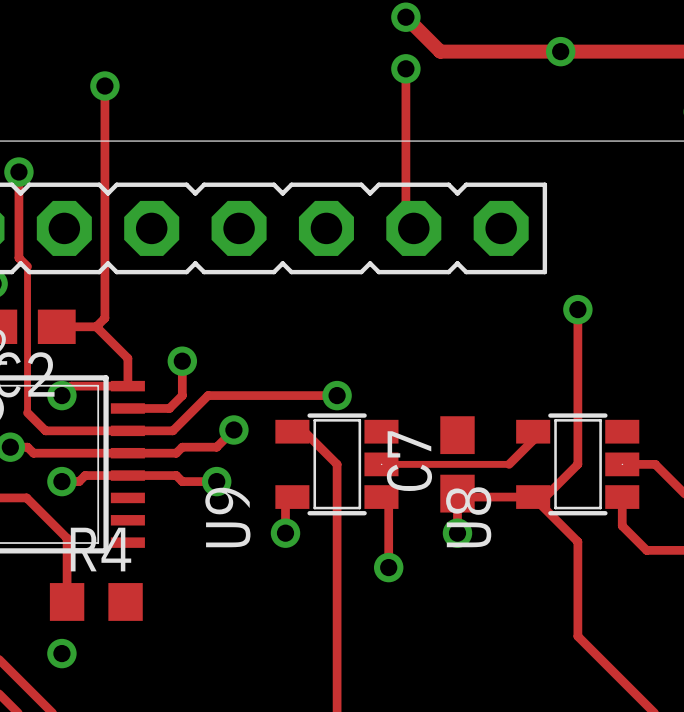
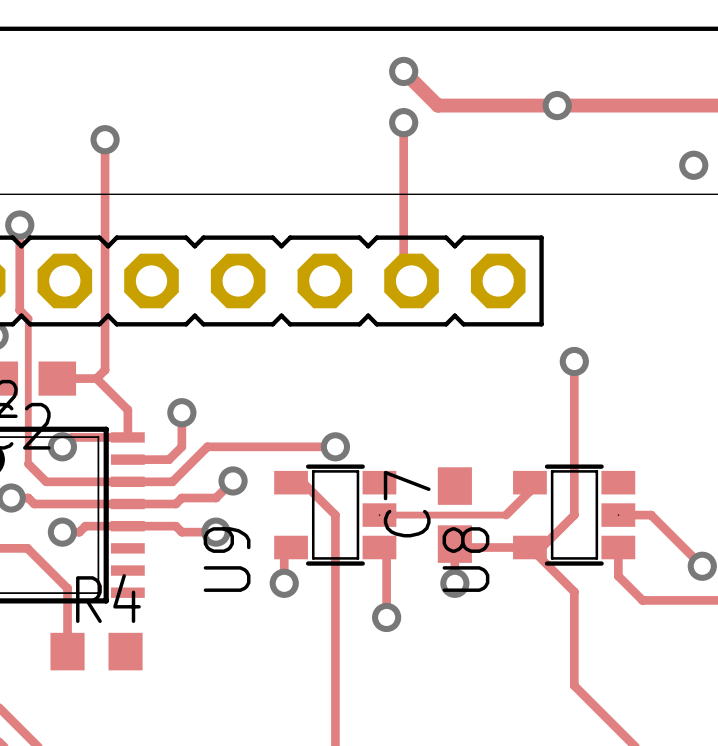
via: (61, 653) -> none

